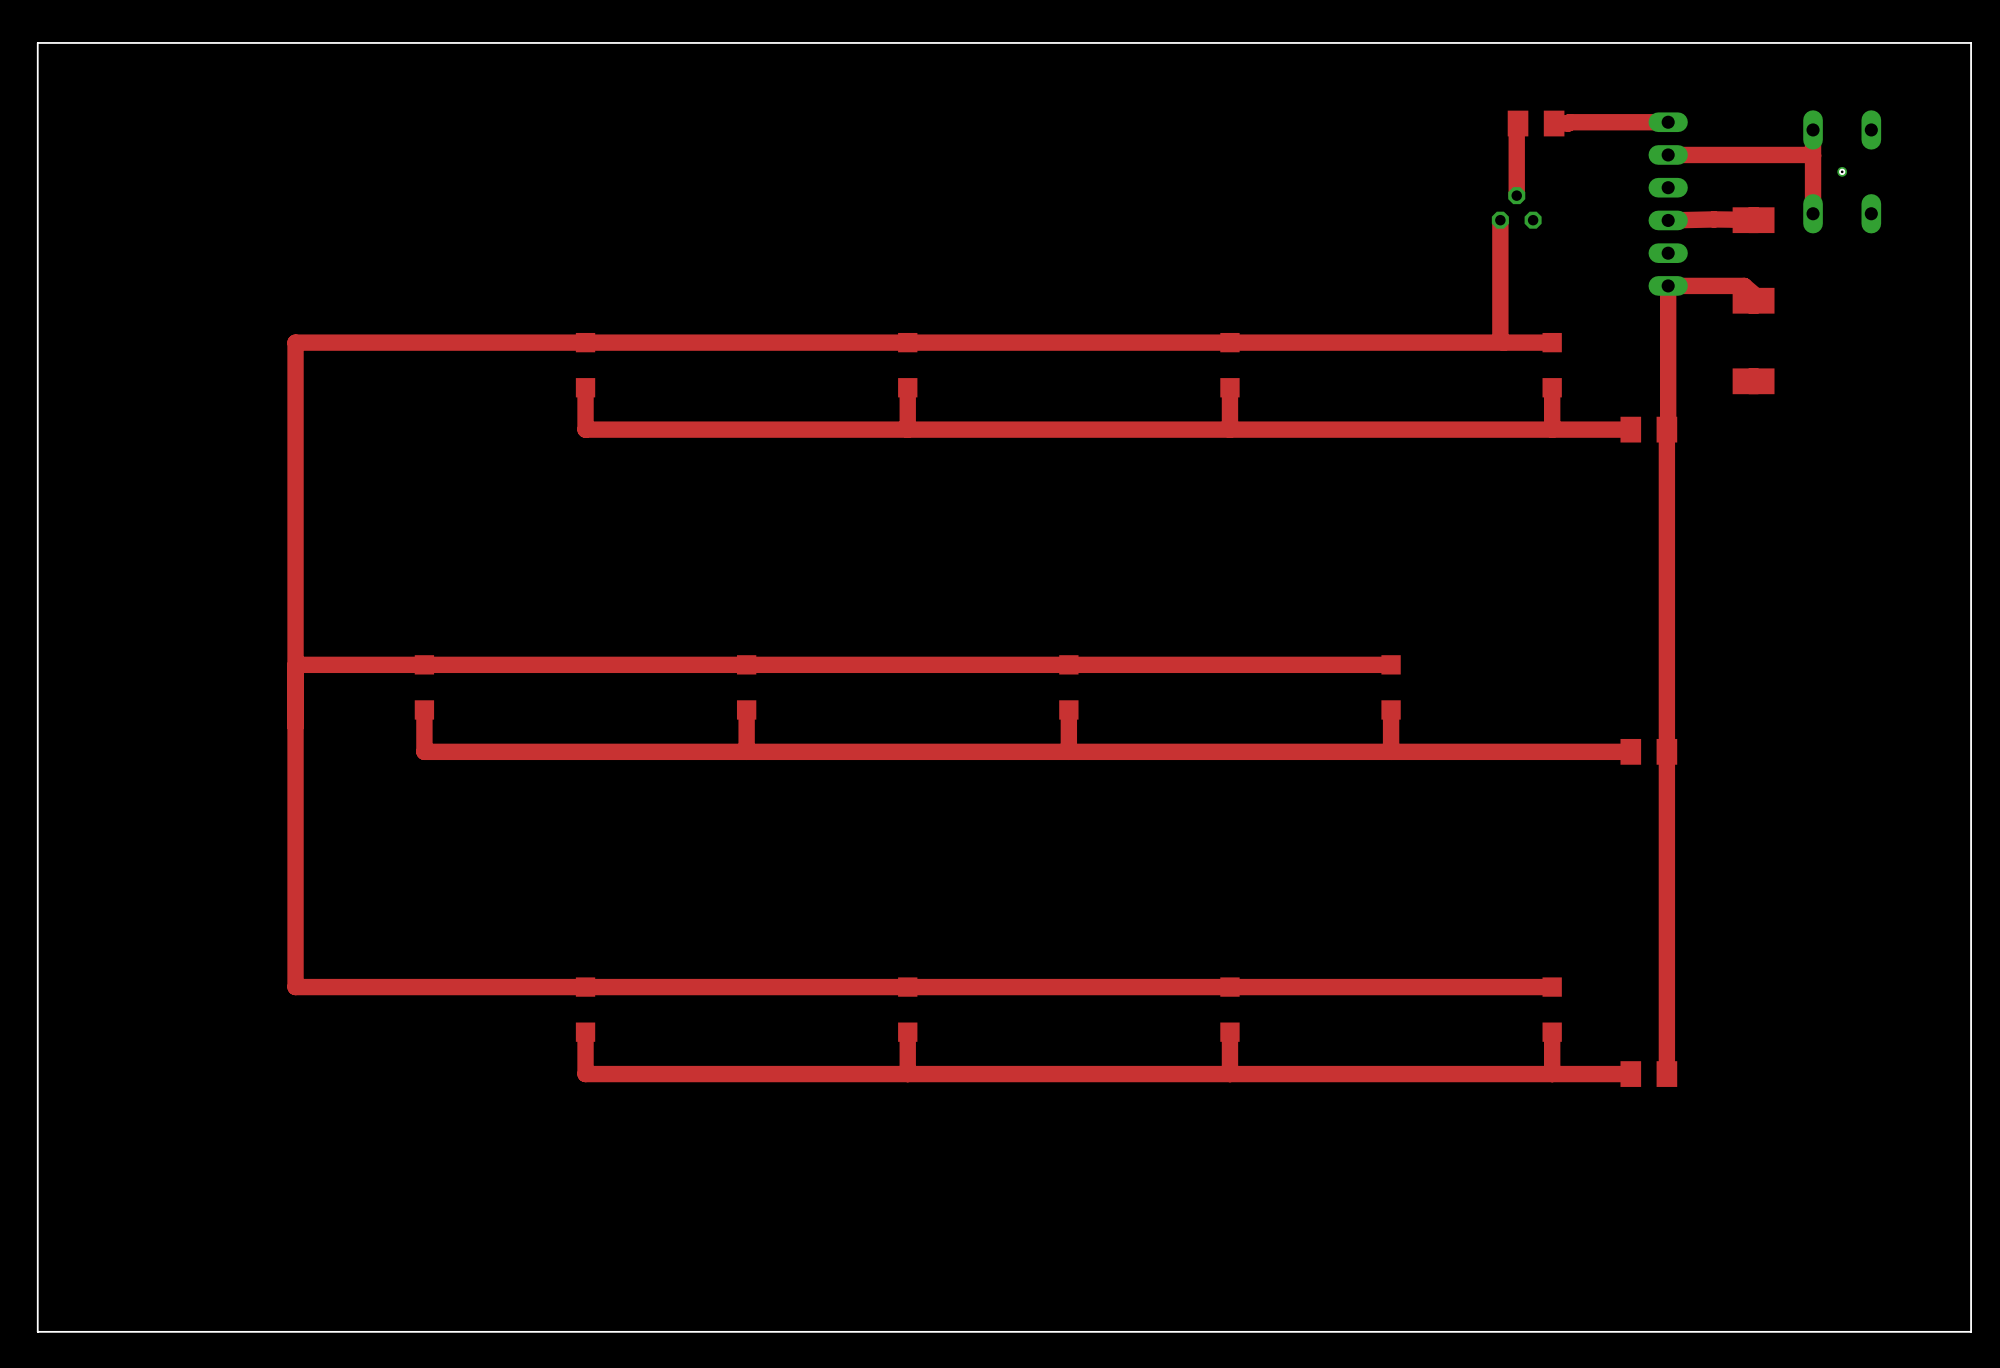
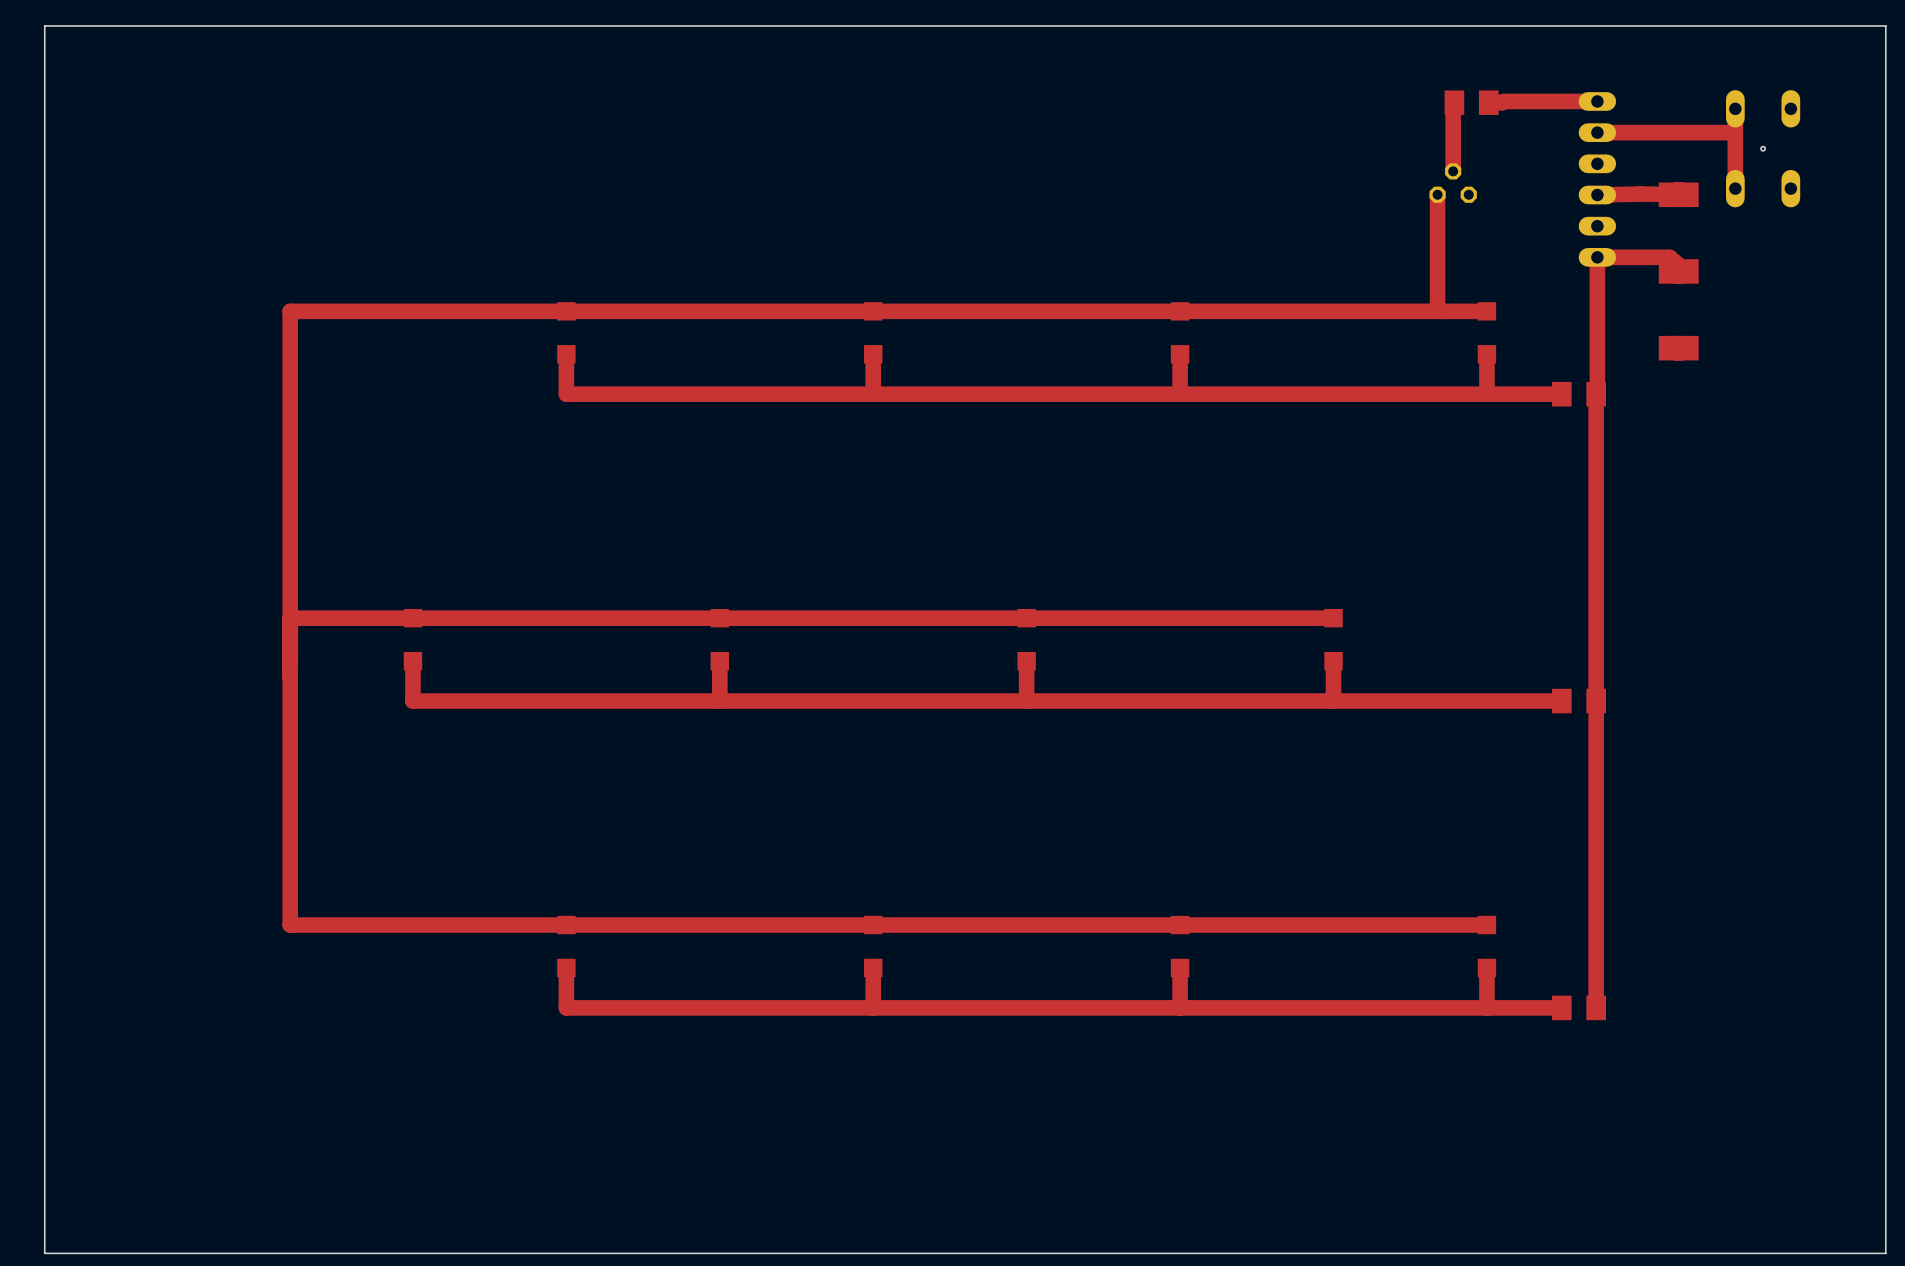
via: (1842, 171) -> none

